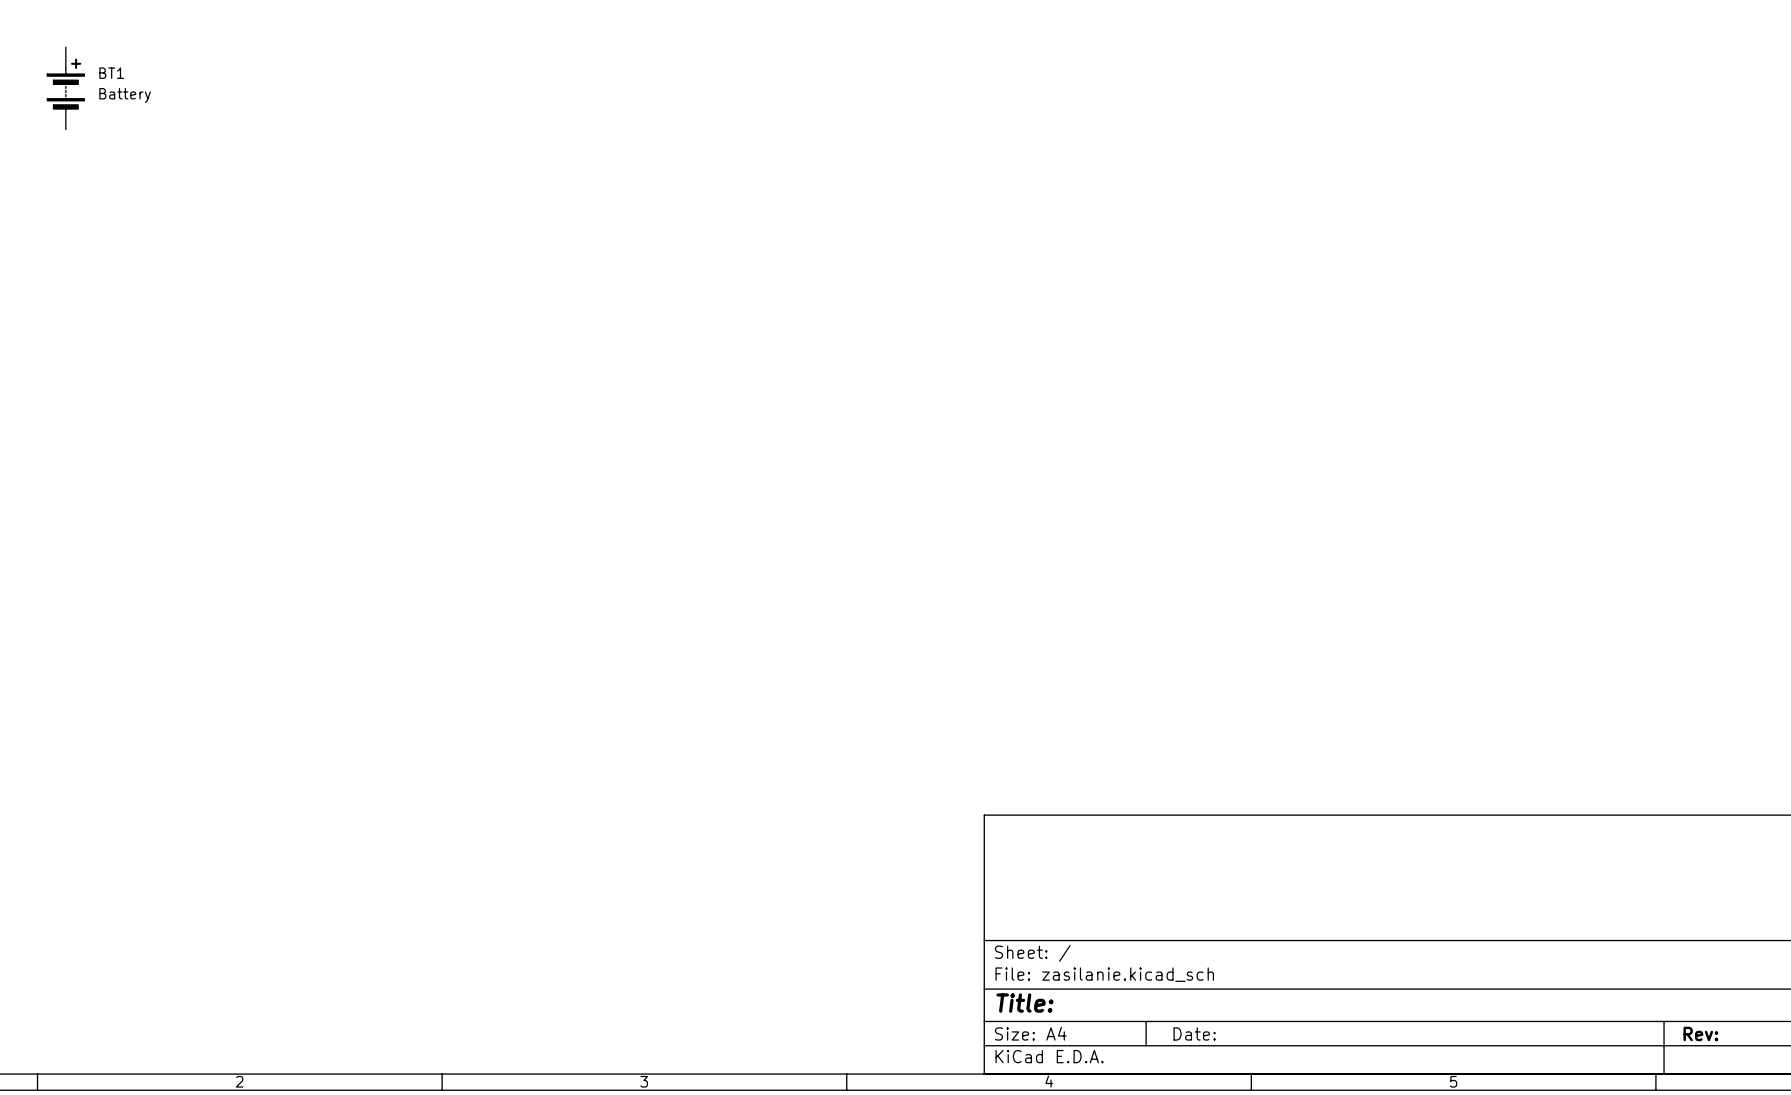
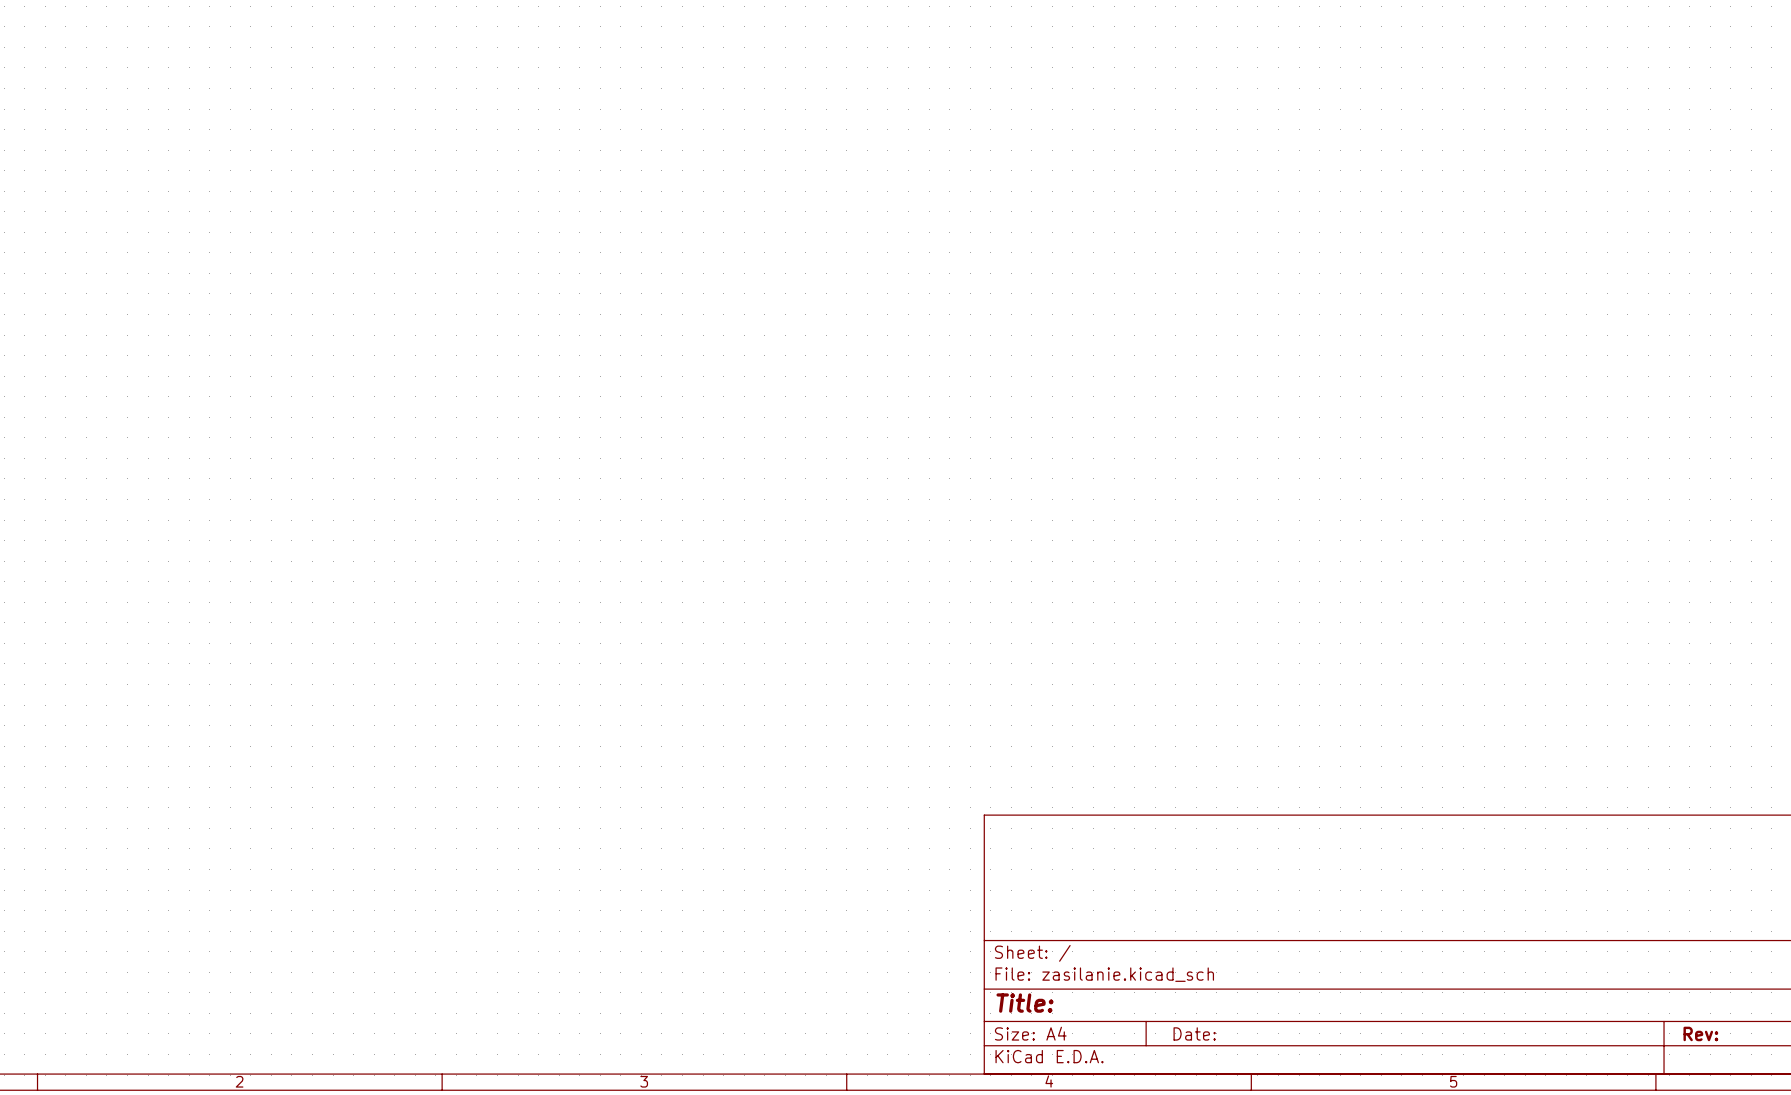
BT1: Battery (65, 88) -> none

